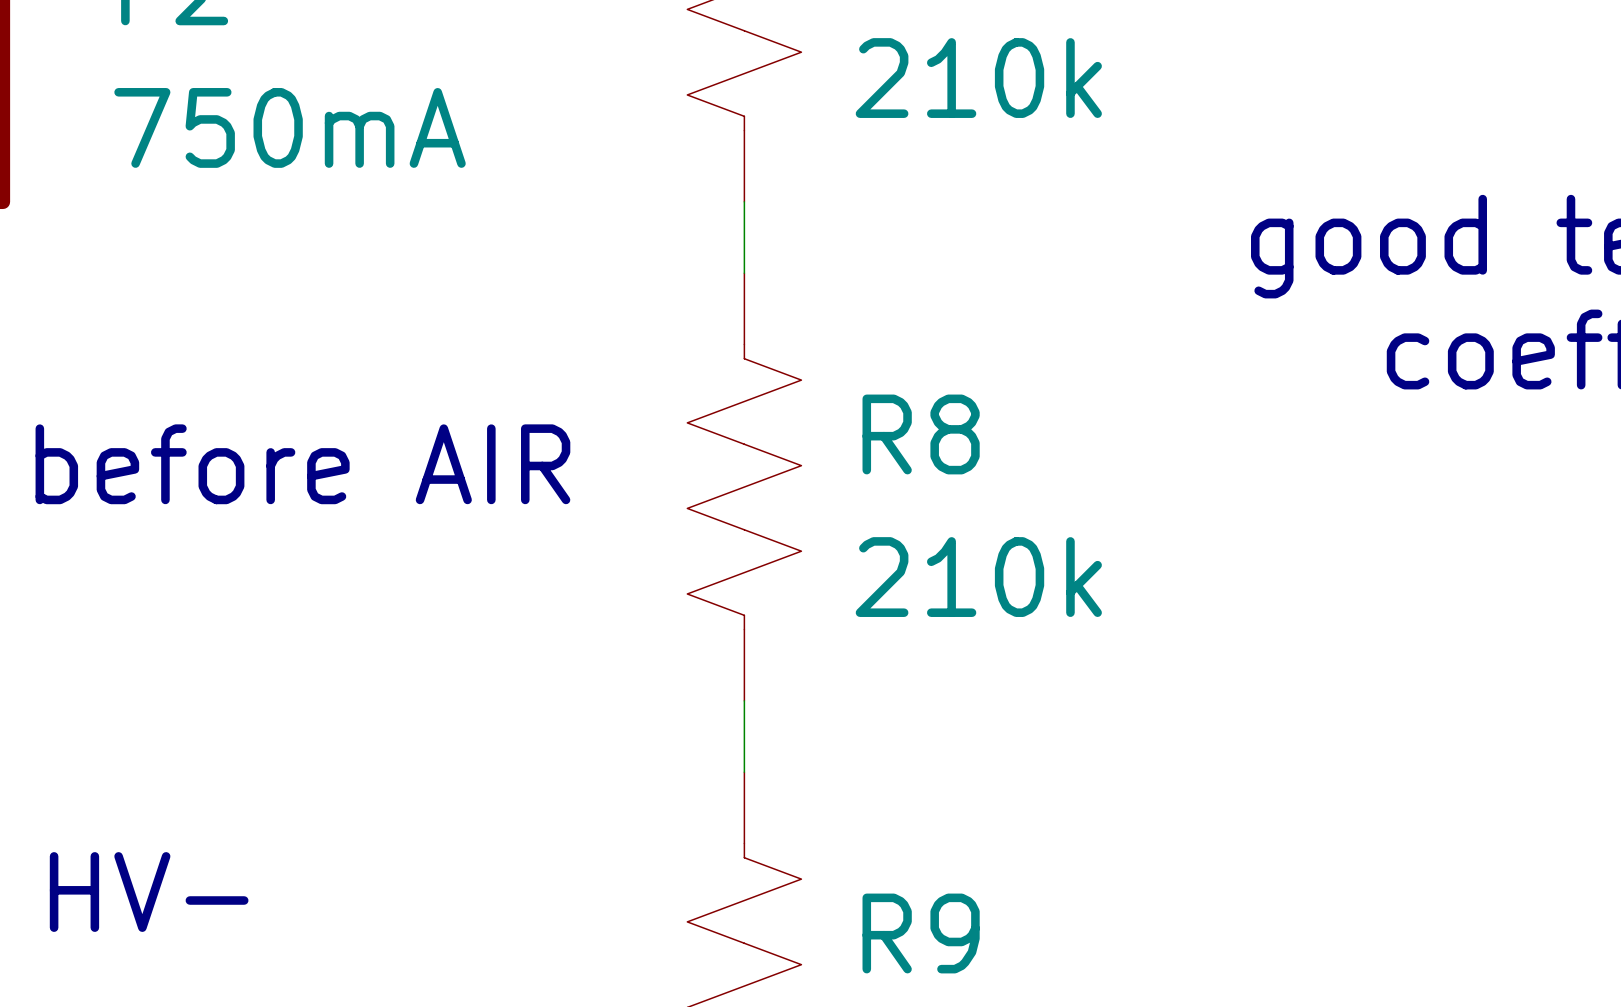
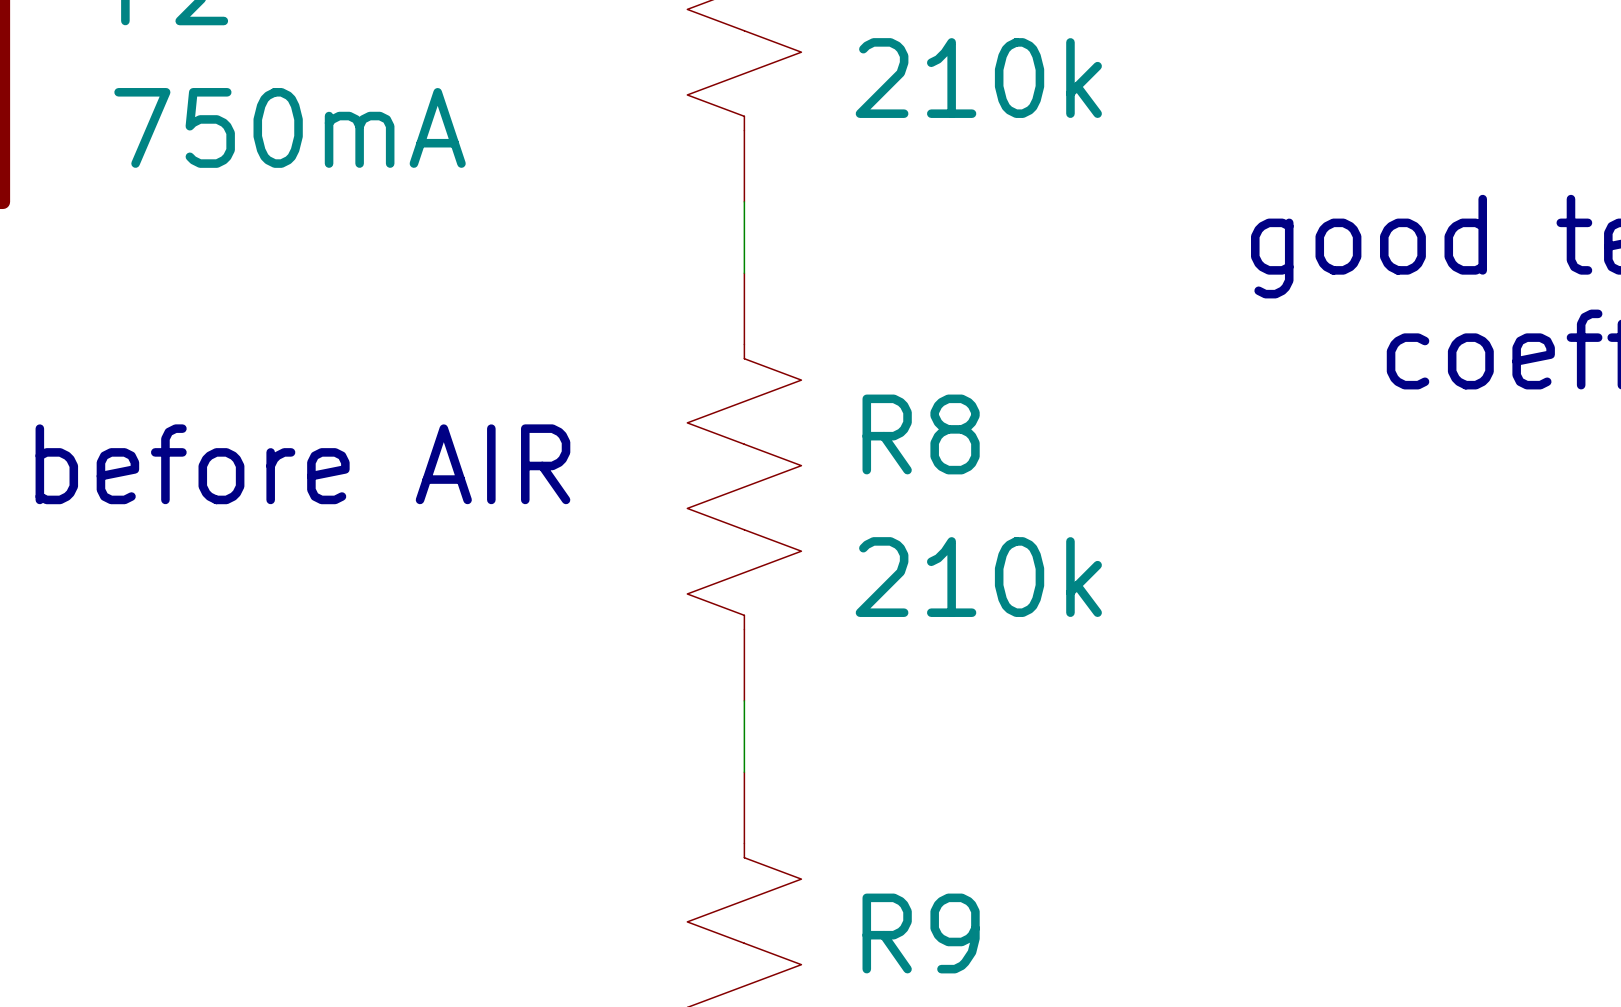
text: HV- (149, 892) -> none

